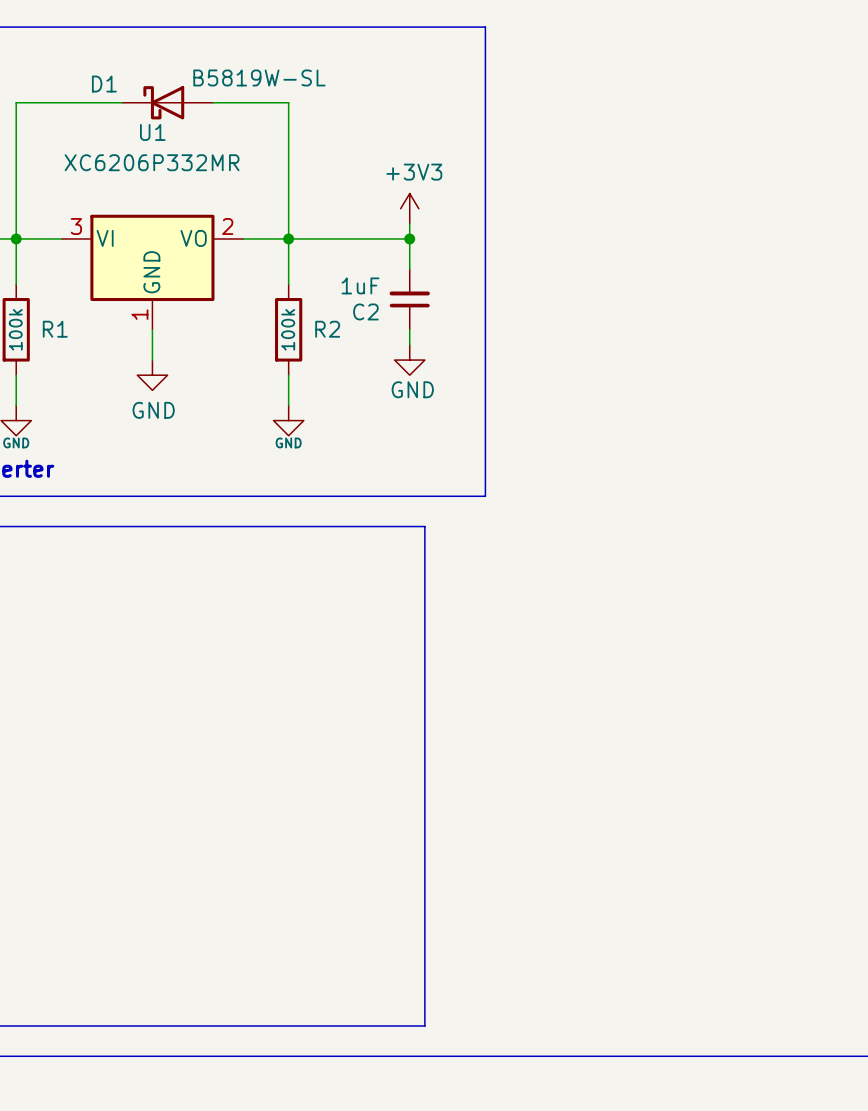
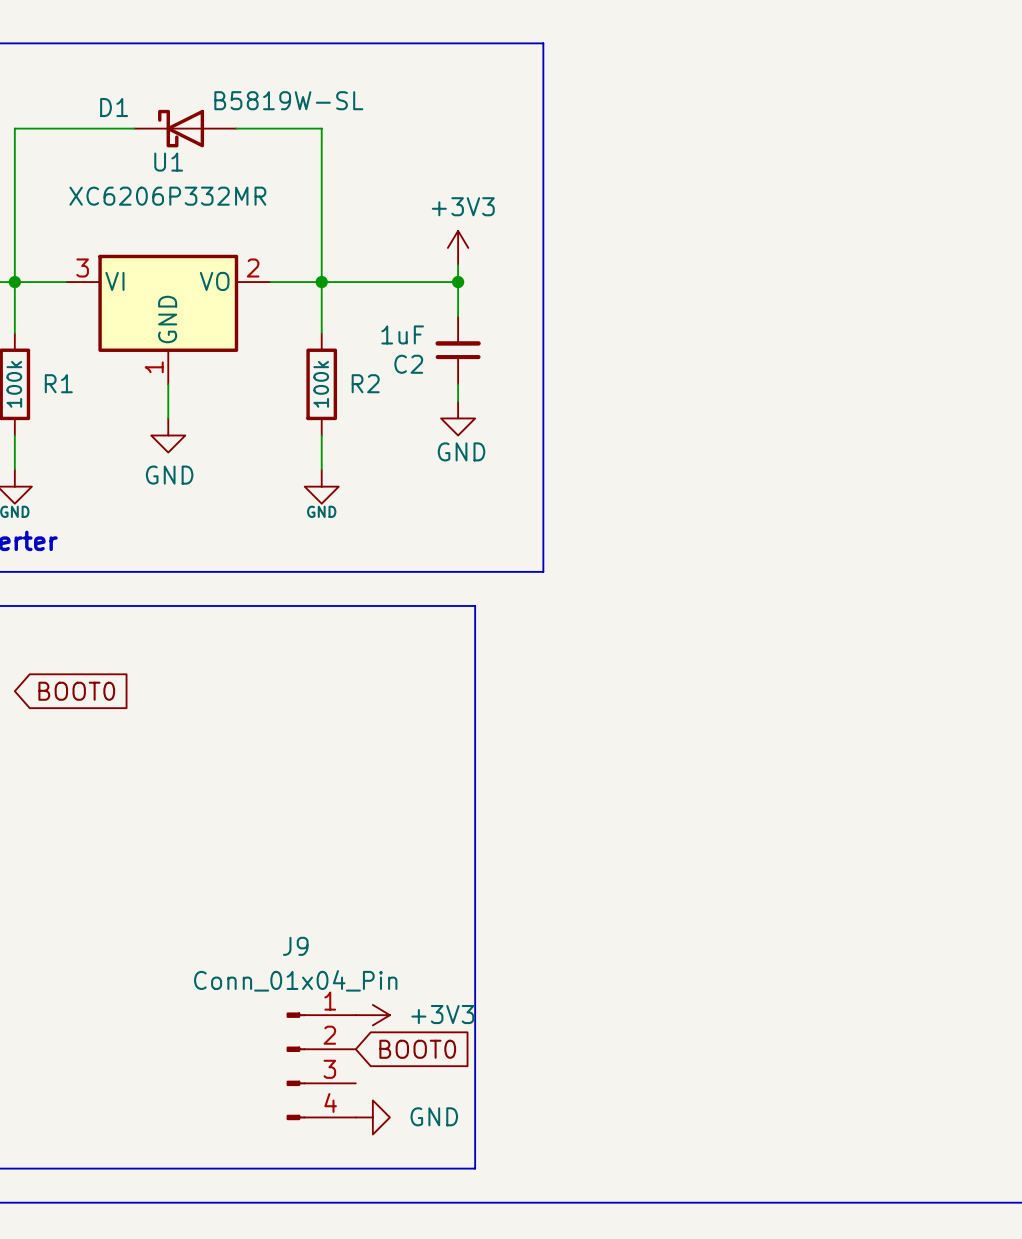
global label: none -> BOOT0 (76, 691)
power symbol: none -> +3V3 (372, 1015)
global label: none -> BOOT0 (417, 1049)
J9: none -> Conn_01x04_Pin (321, 1066)
power symbol: none -> GND (372, 1117)

